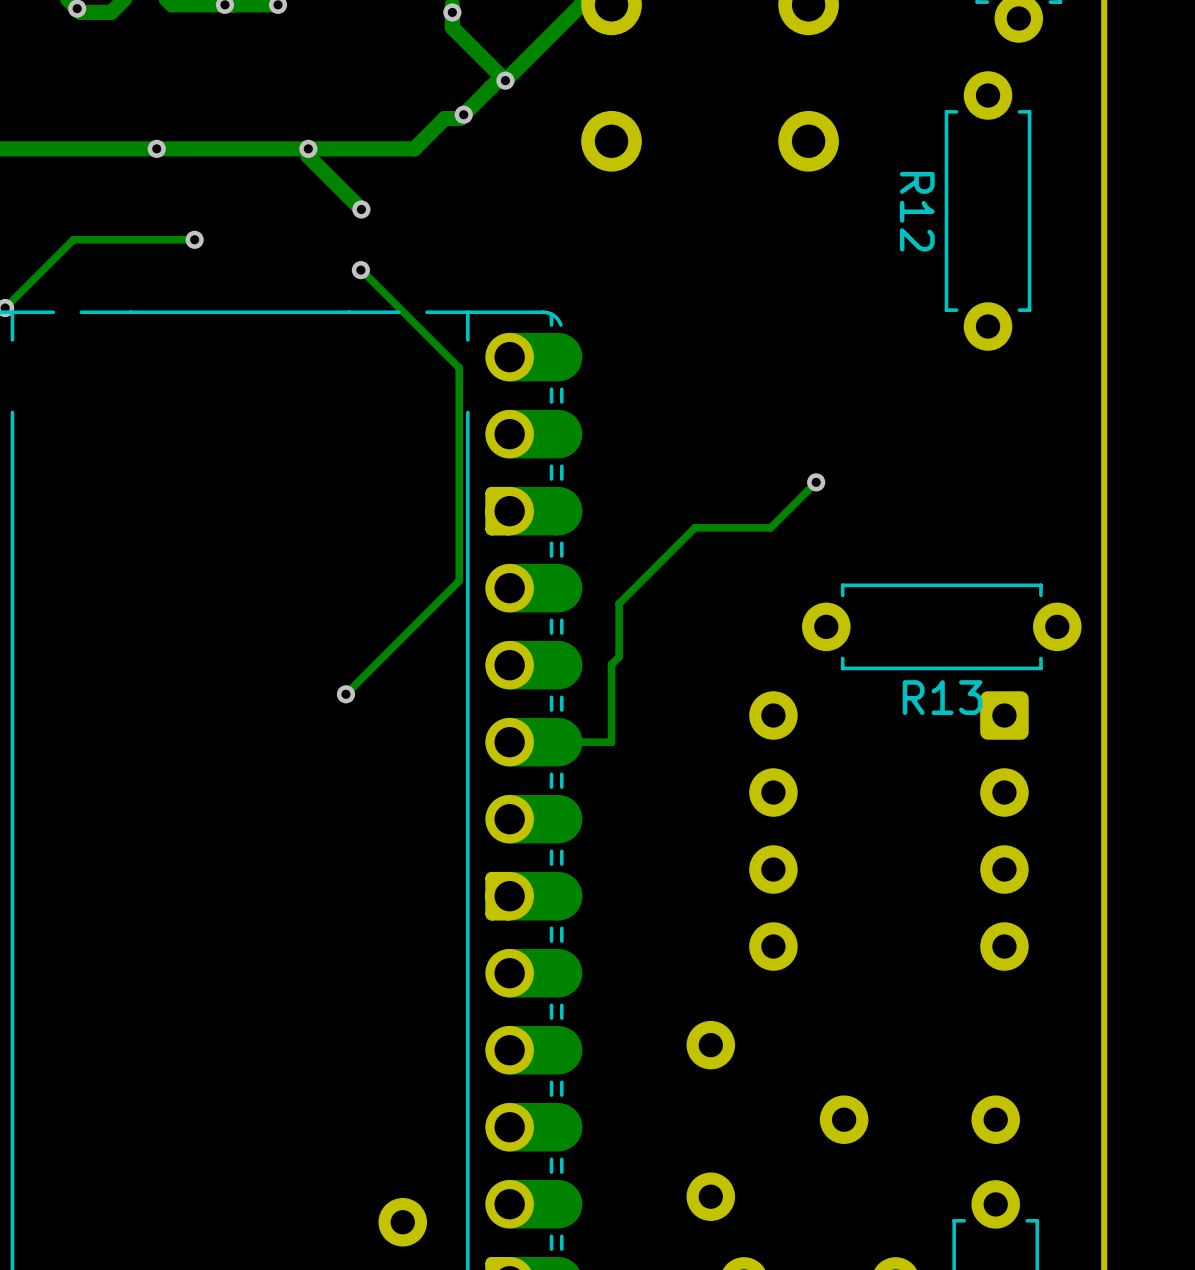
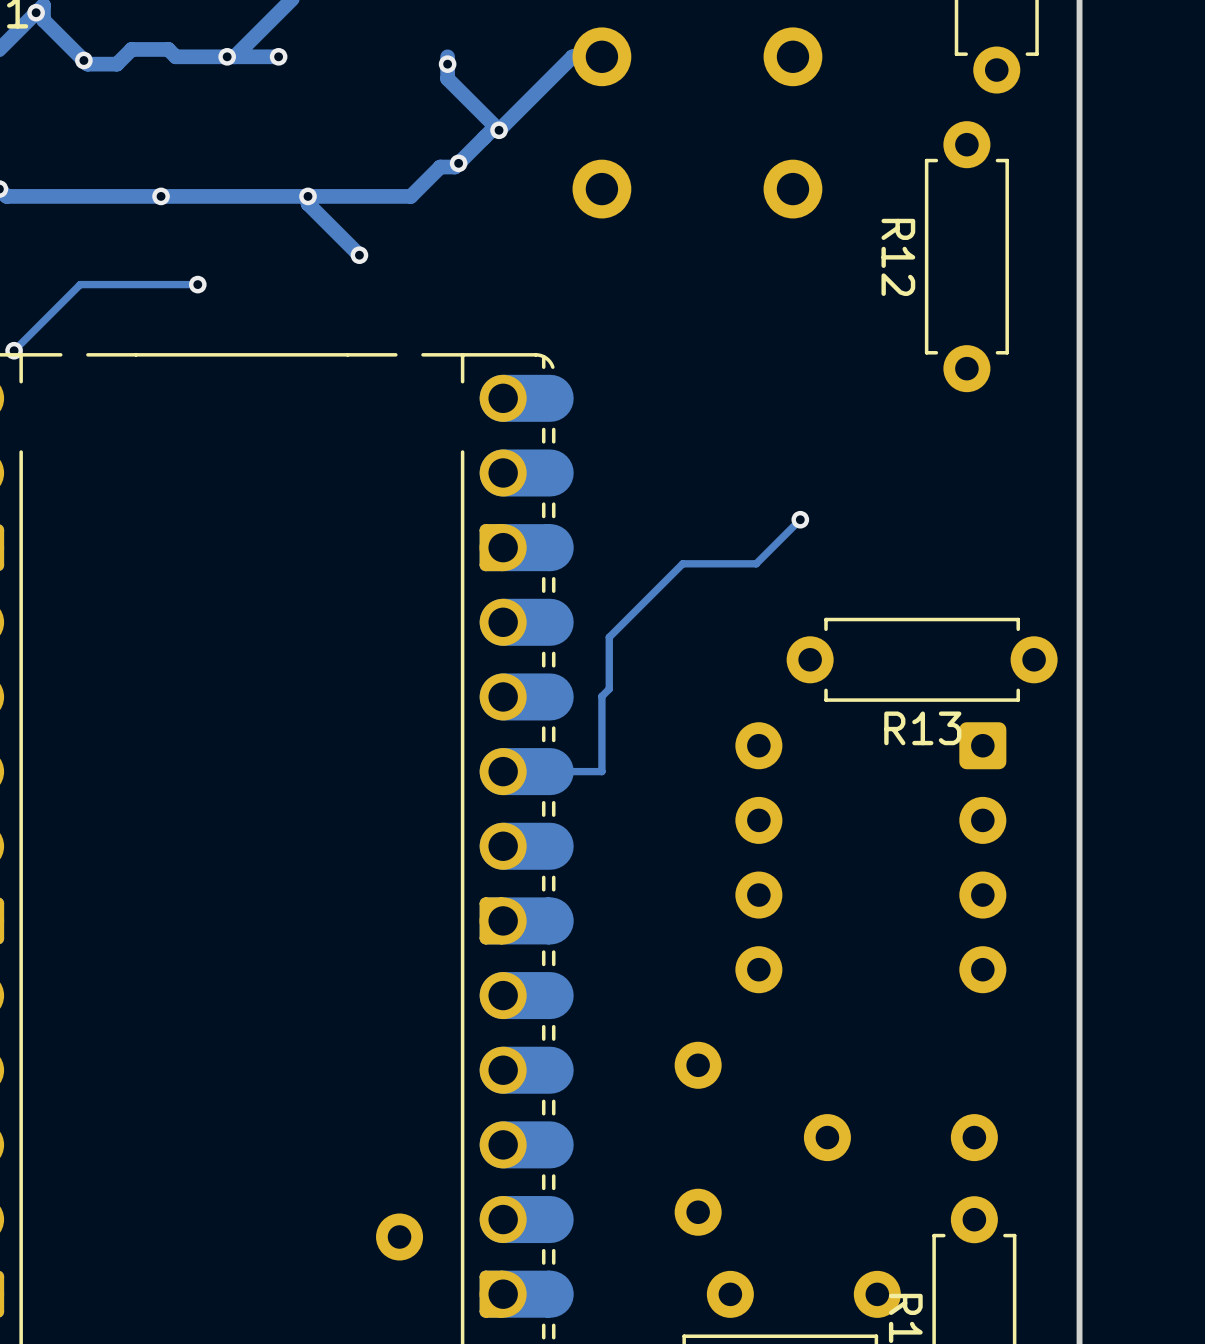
via: (360, 270) -> none
track: (361, 270) (459, 367) (459, 581) (345, 694) -> none
via: (345, 694) -> none

